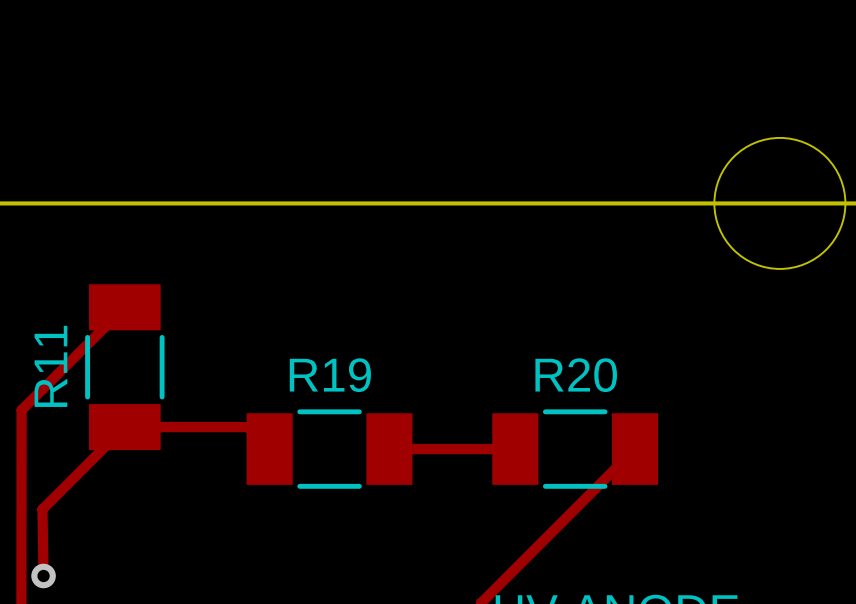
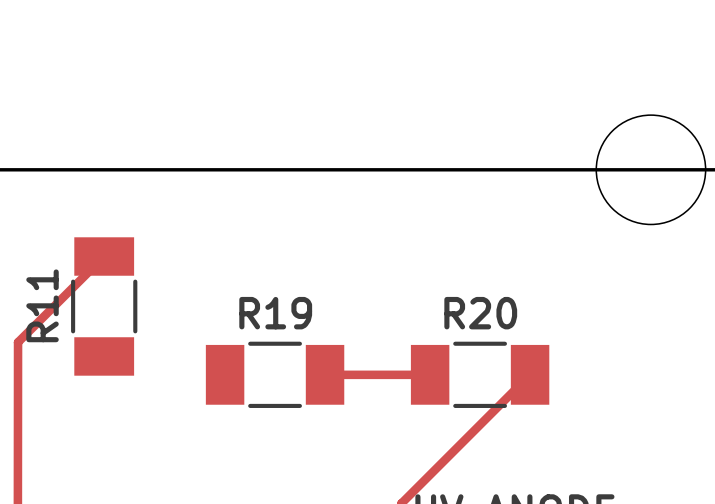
track: (269, 449) (247, 427) (124, 427) (42, 509) (43, 575) -> none
via: (43, 575) -> none

